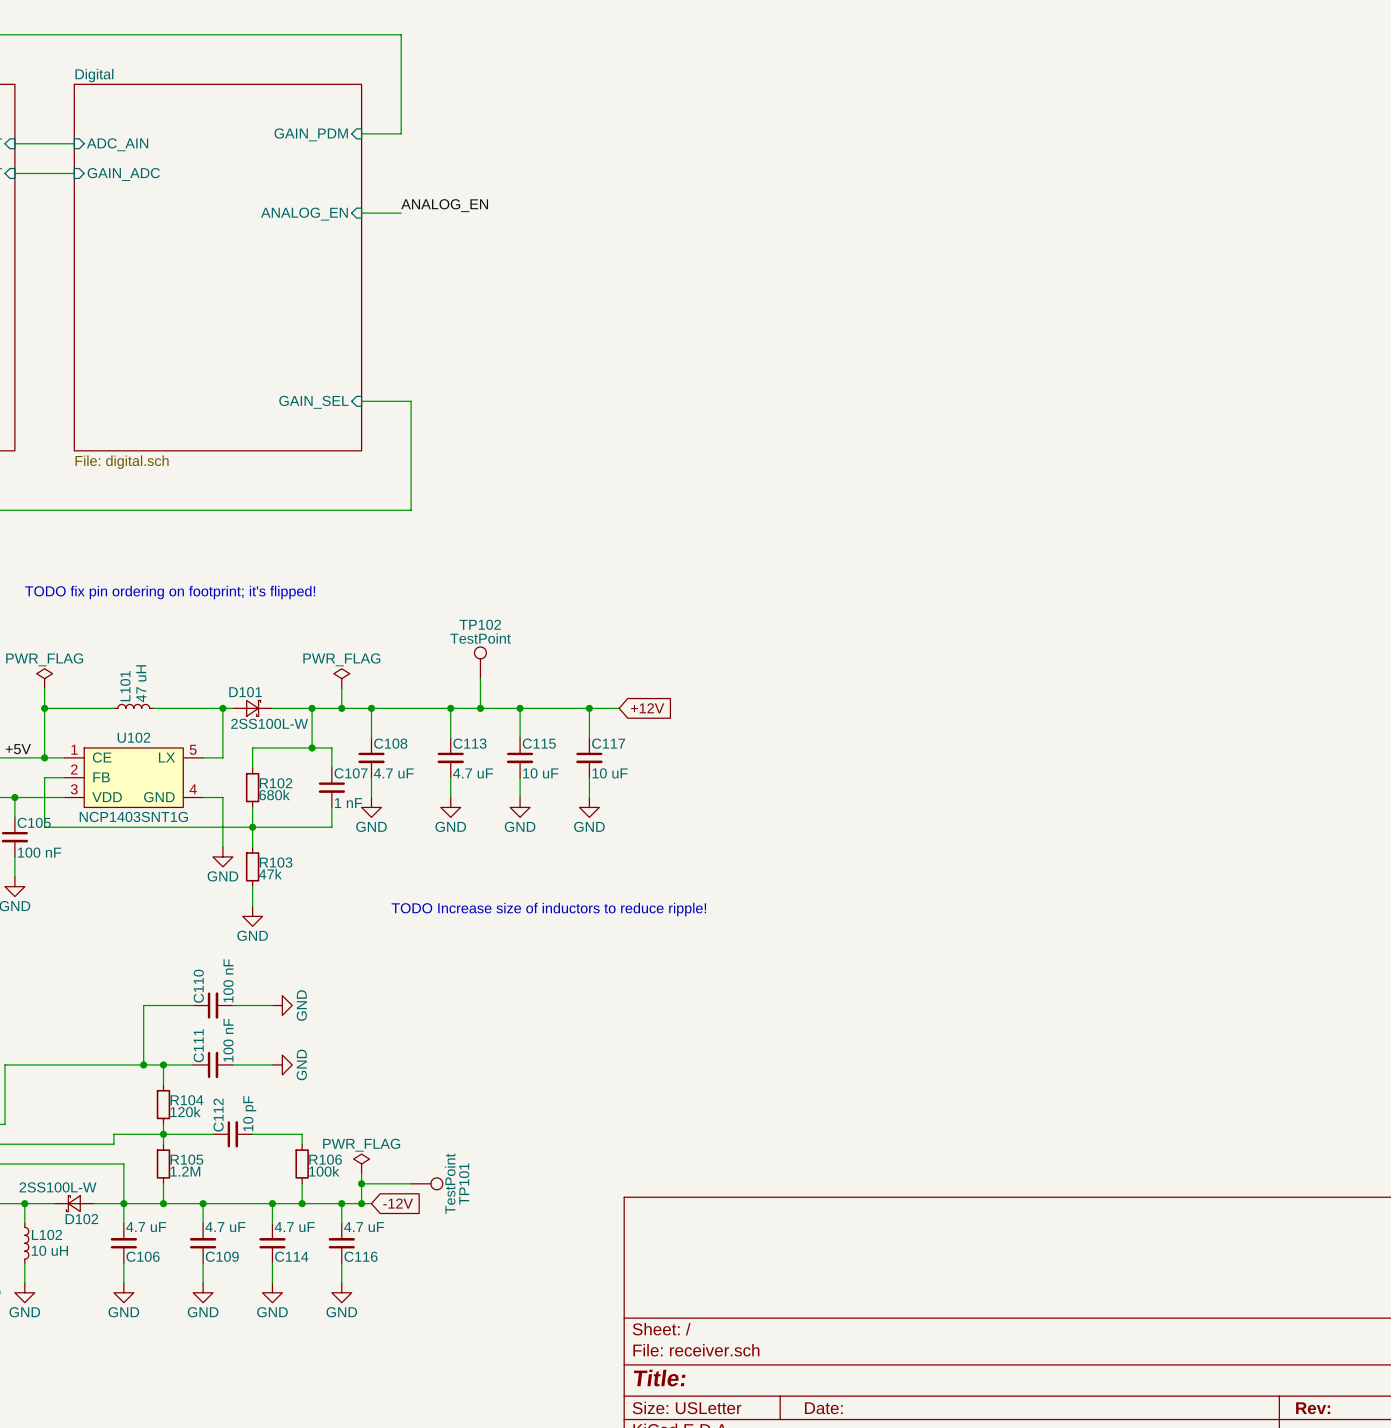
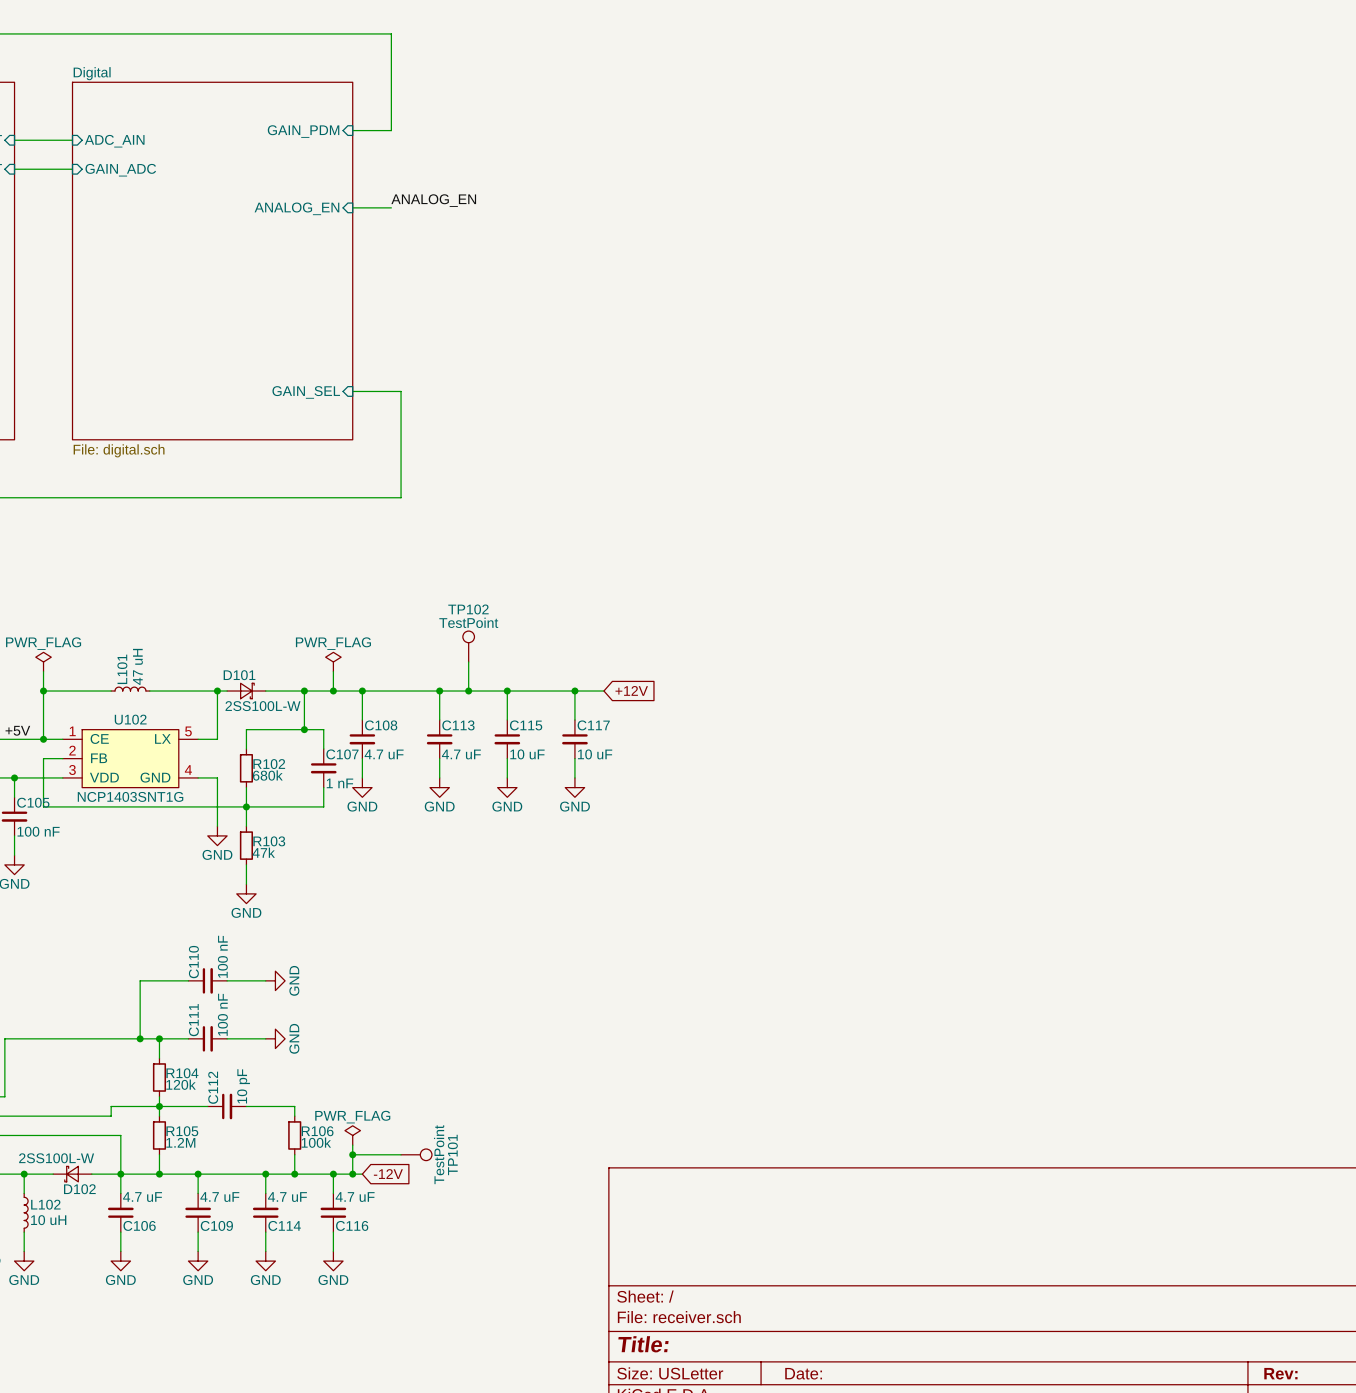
text: TODO fix pin ordering on footprint; it's flipped! (170, 592) -> none
text: TODO Increase size of inductors to reduce ripple! (548, 909) -> none

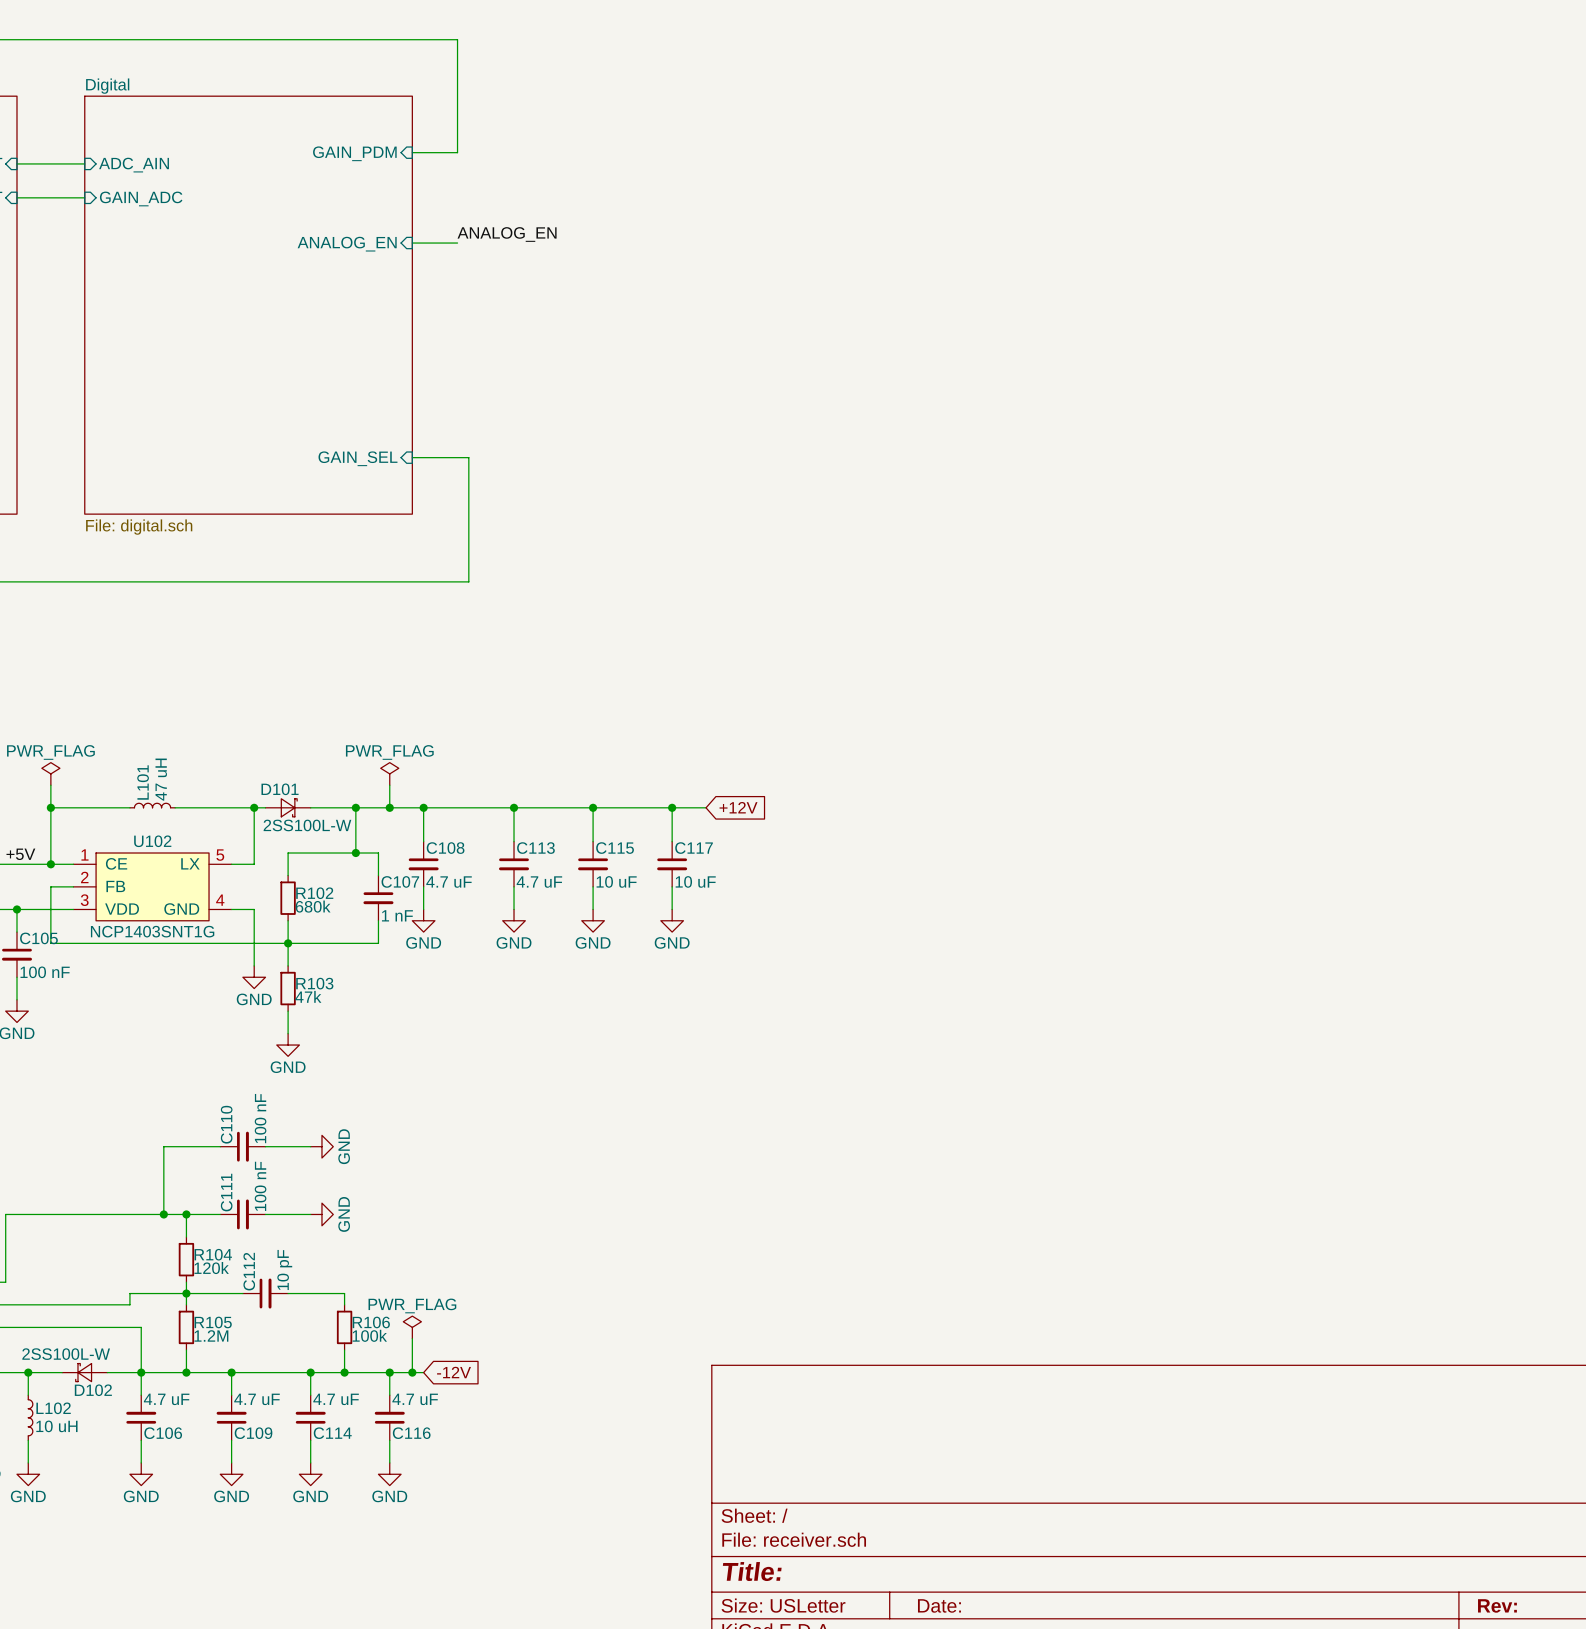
TP102: TestPoint (468, 646) -> none
wire: (468, 662) (468, 691) -> none
junction: (468, 691) -> none
wire: (352, 1154) (401, 1154) -> none
junction: (352, 1154) -> none
TP101: TestPoint (416, 1154) -> none

